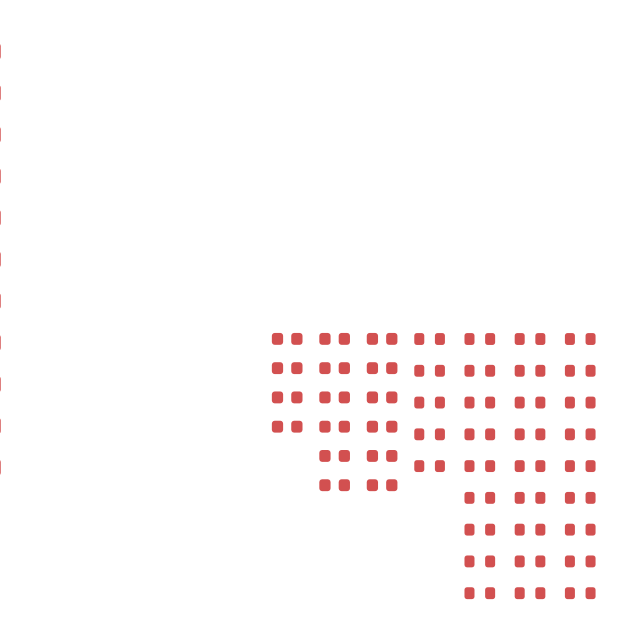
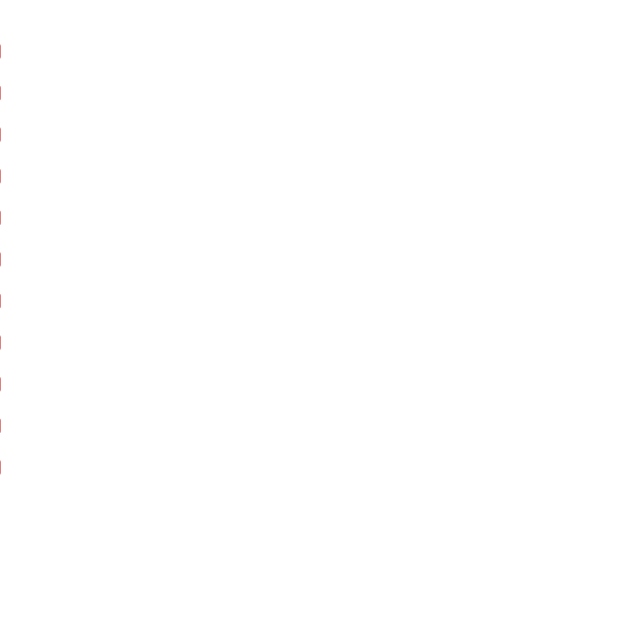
part: (287, 338) -> none
part: (334, 338) -> none
part: (382, 338) -> none
part: (429, 339) -> none
part: (479, 339) -> none
part: (530, 339) -> none
part: (580, 339) -> none
part: (287, 368) -> none
part: (334, 368) -> none
part: (382, 368) -> none
part: (429, 370) -> none
part: (479, 370) -> none
part: (530, 370) -> none
part: (580, 370) -> none
part: (287, 397) -> none
part: (334, 397) -> none
part: (382, 397) -> none
part: (429, 402) -> none
part: (479, 402) -> none
part: (530, 402) -> none
part: (580, 402) -> none
part: (287, 426) -> none
part: (334, 426) -> none
part: (382, 426) -> none
part: (429, 434) -> none
part: (479, 434) -> none
part: (530, 434) -> none
part: (580, 434) -> none
part: (334, 455) -> none
part: (382, 455) -> none
part: (429, 466) -> none
part: (479, 466) -> none
part: (530, 466) -> none
part: (580, 466) -> none
part: (334, 485) -> none
part: (382, 485) -> none
part: (479, 497) -> none
part: (530, 497) -> none
part: (580, 497) -> none
part: (479, 529) -> none
part: (530, 529) -> none
part: (580, 529) -> none
part: (479, 561) -> none
part: (530, 561) -> none
part: (580, 561) -> none
part: (479, 593) -> none
part: (530, 593) -> none
part: (580, 593) -> none

